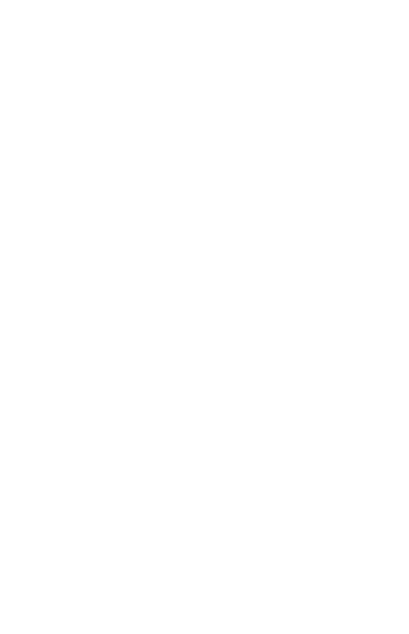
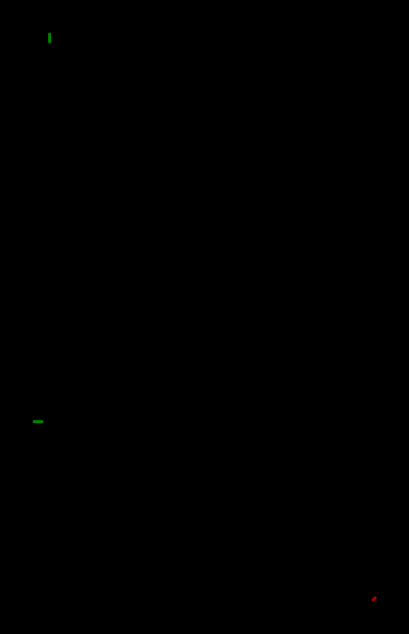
bottom track: none -> (49, 34) (49, 41)
bottom track: none -> (41, 421) (34, 421)
top track: none -> (375, 597) (373, 599)

